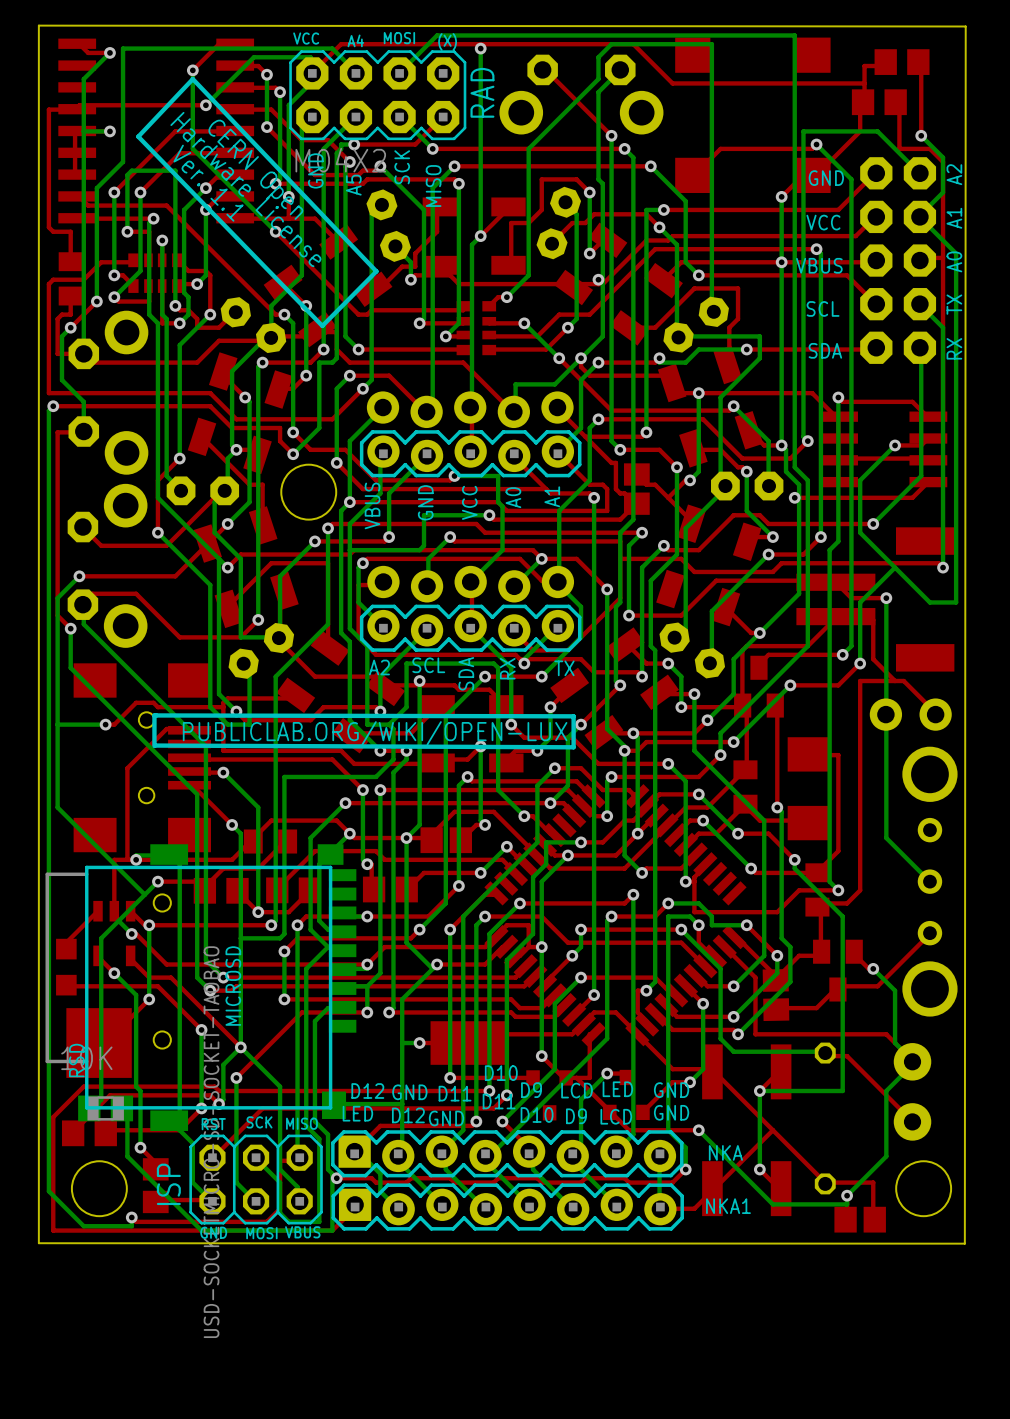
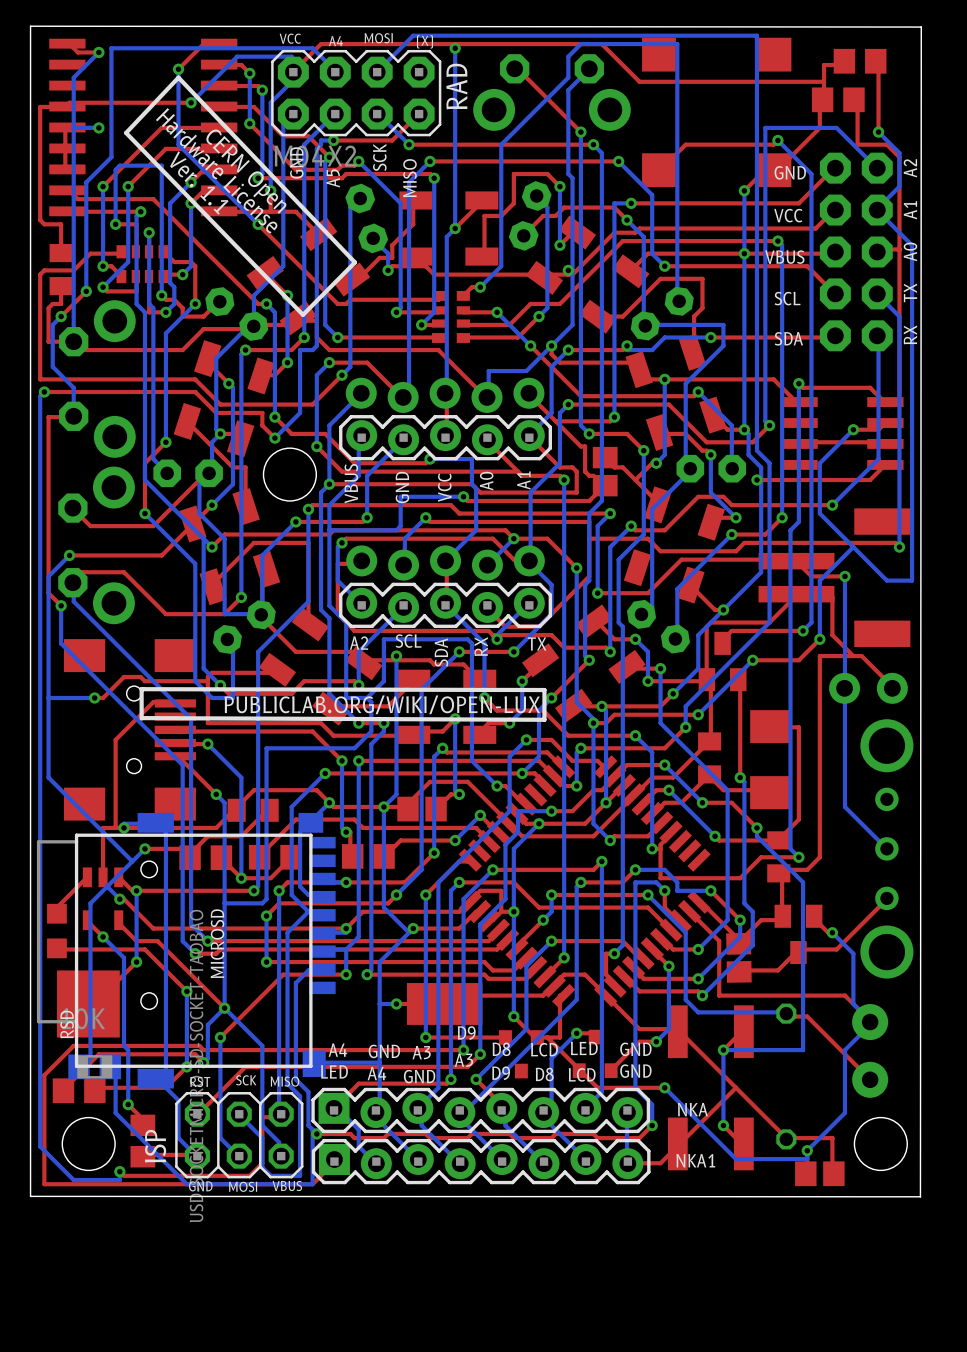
text: D10 (501, 1073) -> D9 (466, 1032)
text: D9 (531, 1090) -> D8 (501, 1049)
text: D12 (367, 1091) -> A4 (337, 1050)
text: D11 (455, 1093) -> A3 (421, 1052)
text: D11 (499, 1101) -> A3 (463, 1060)
text: D10 (537, 1114) -> D9 (501, 1073)
text: D12 (408, 1115) -> A4 (376, 1073)
text: D9 (576, 1116) -> D8 (544, 1074)

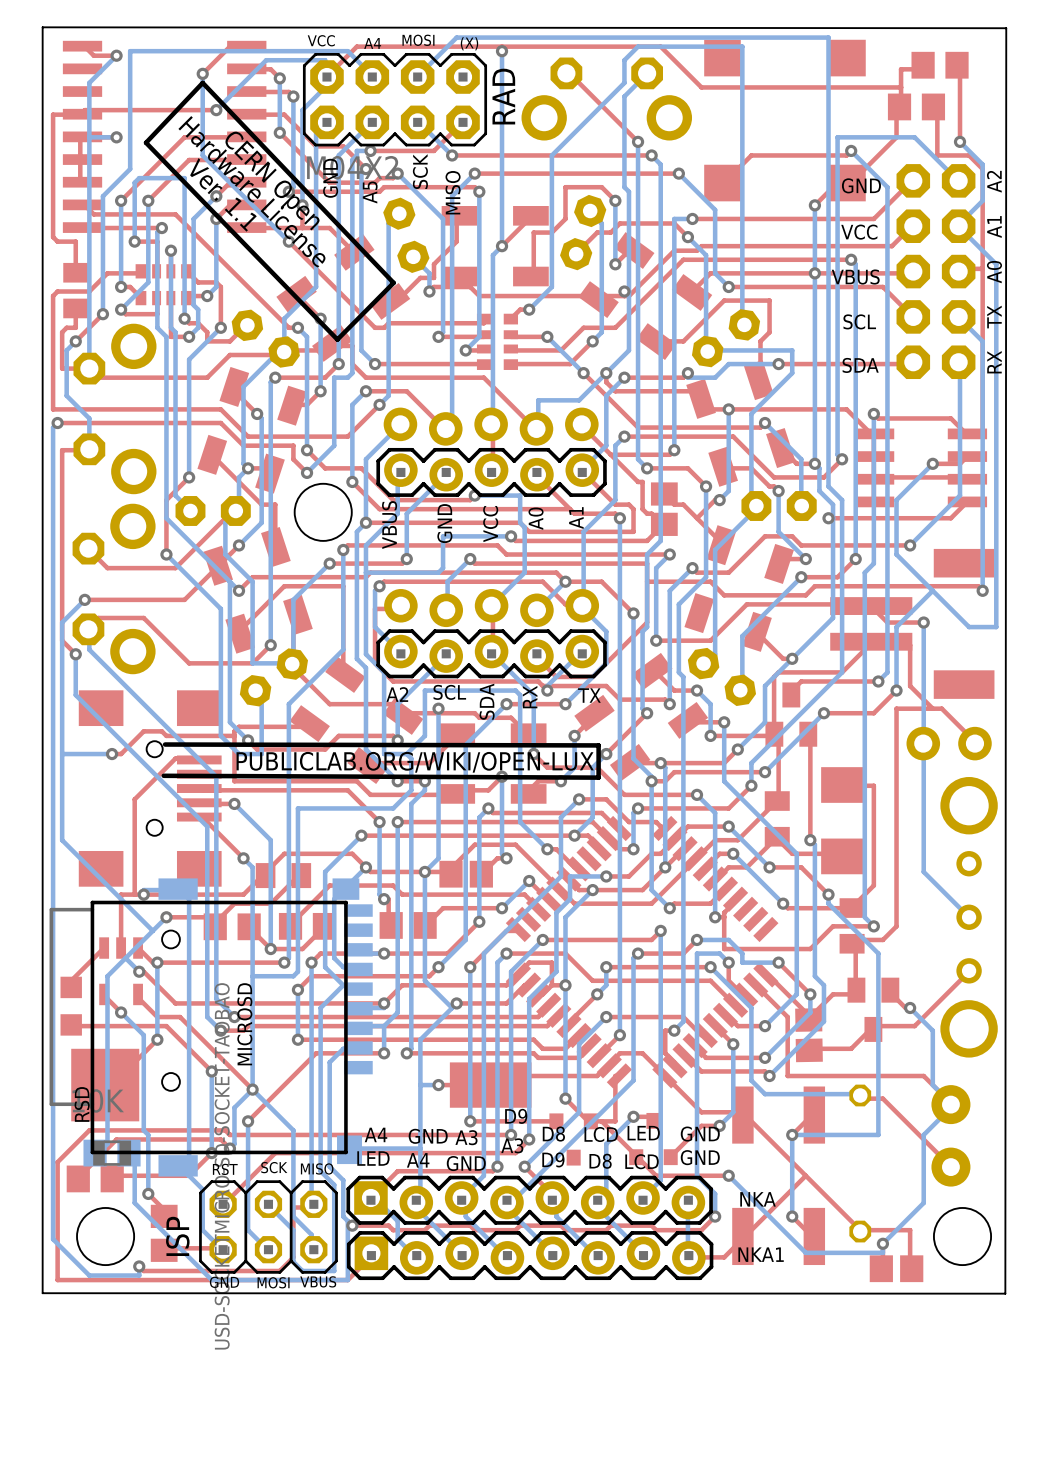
line: (143, 689) (141, 689) (141, 718) -> none

